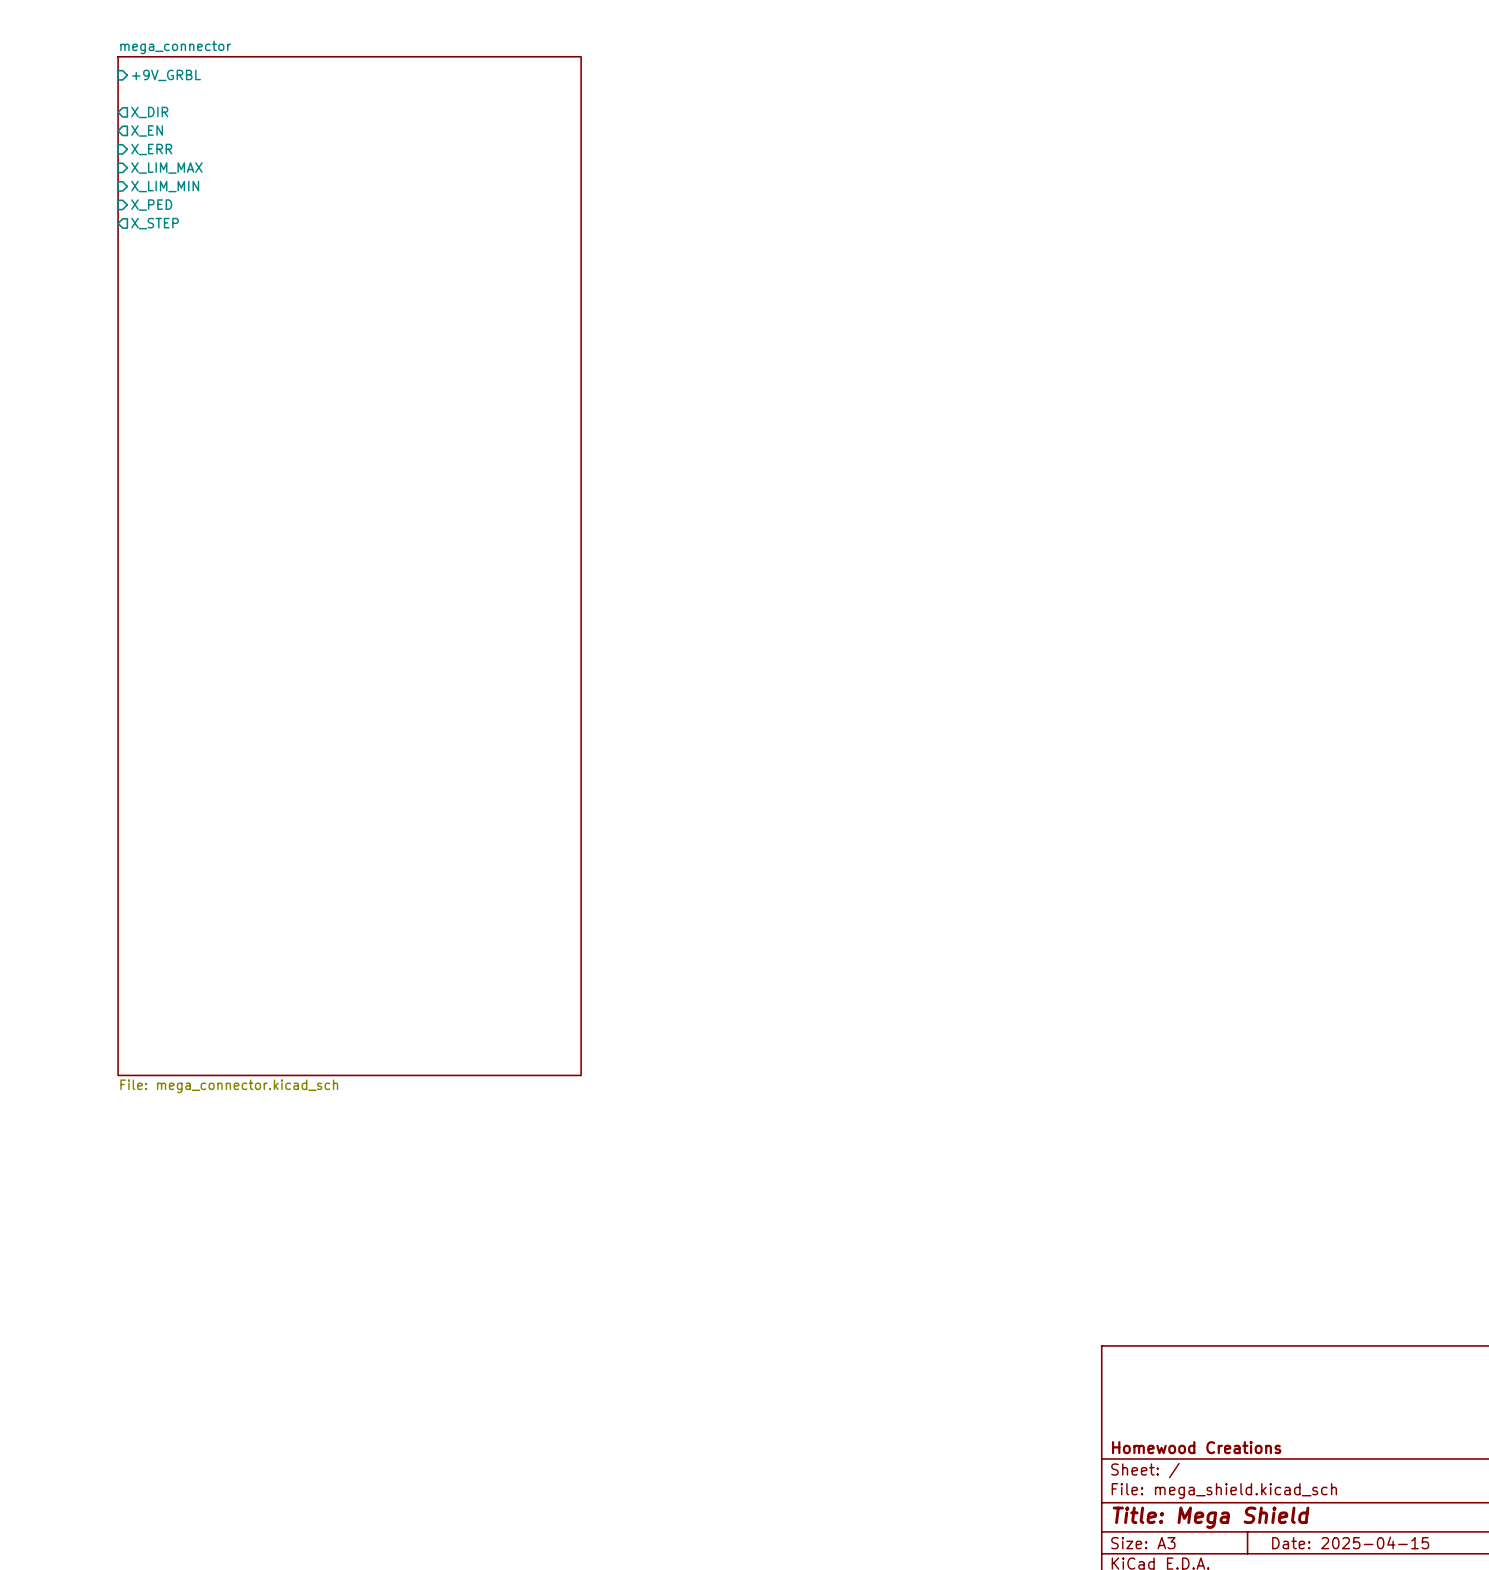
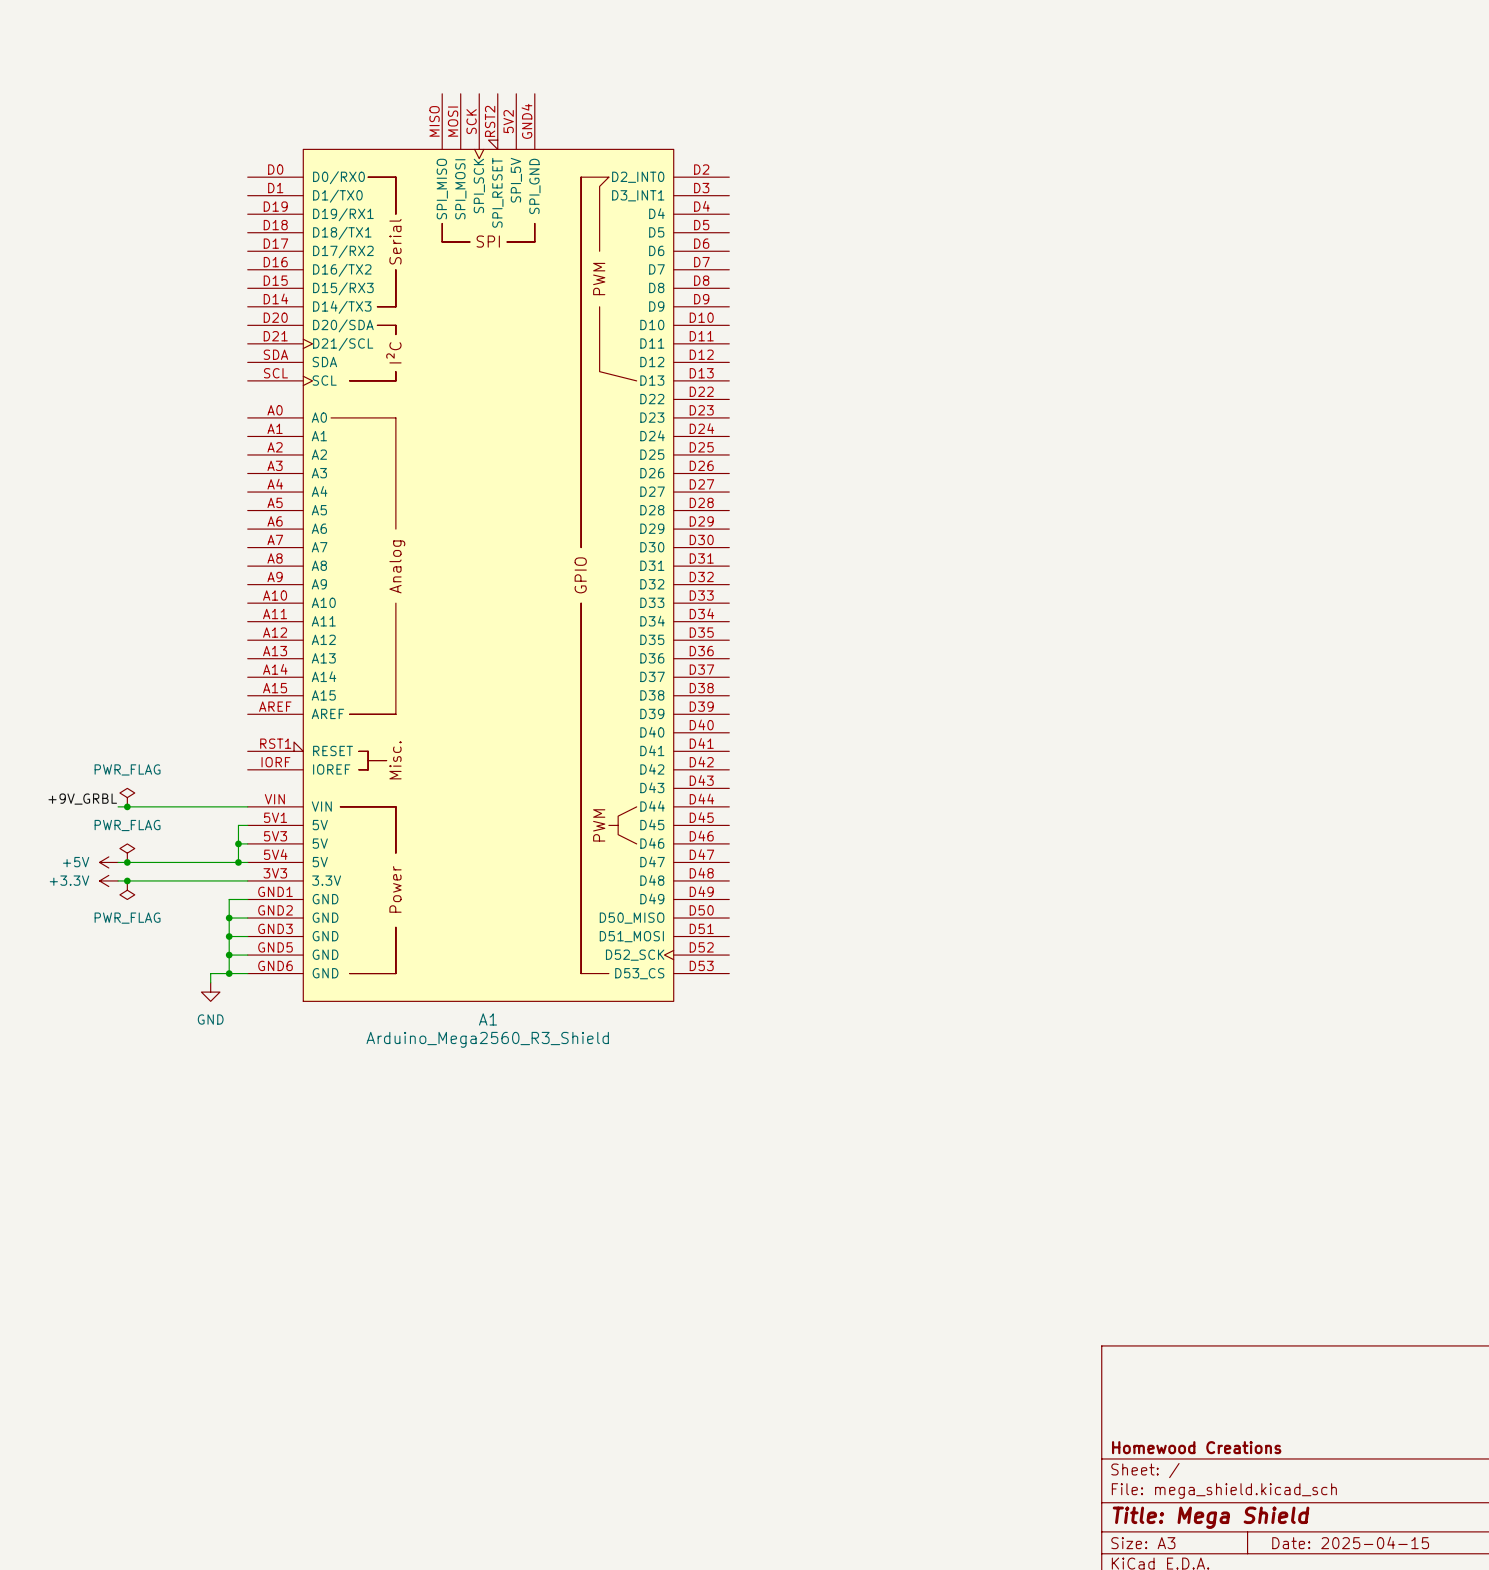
sheet pin: +9V_GRBL (166, 75) -> none
sheet pin: X_DIR (149, 112) -> none
sheet pin: X_EN (147, 130) -> none
sheet pin: X_ERR (151, 149) -> none
sheet pin: X_LIM_MAX (166, 168) -> none
sheet pin: X_LIM_MIN (165, 186) -> none
sheet pin: X_PED (151, 205) -> none
sheet pin: X_STEP (155, 223) -> none
A1: none -> Arduino_Mega2560_R3_Shield (488, 547)
sheet mega_connector: File: mega_connector.kicad_sch (349, 566) -> none
power symbol: none -> PWR_FLAG (127, 797)
label: none -> +9V_GRBL (82, 799)
wire: none -> (118, 806) (247, 806)
junction: none -> (127, 806)
wire: none -> (247, 825) (238, 825) (238, 862)
wire: none -> (238, 843) (247, 843)
junction: none -> (238, 843)
power symbol: none -> PWR_FLAG (127, 853)
power symbol: none -> +5V (108, 862)
wire: none -> (118, 862) (247, 862)
junction: none -> (127, 862)
junction: none -> (238, 862)
power symbol: none -> +3.3V (108, 880)
wire: none -> (118, 880) (247, 880)
junction: none -> (127, 880)
power symbol: none -> PWR_FLAG (127, 890)
wire: none -> (247, 899) (229, 899) (229, 973)
wire: none -> (229, 918) (247, 918)
junction: none -> (229, 918)
wire: none -> (229, 936) (247, 936)
junction: none -> (229, 936)
wire: none -> (229, 955) (247, 955)
junction: none -> (229, 955)
junction: none -> (229, 973)
wire: none -> (247, 973) (210, 973) (210, 982)
power symbol: none -> GND (210, 992)

